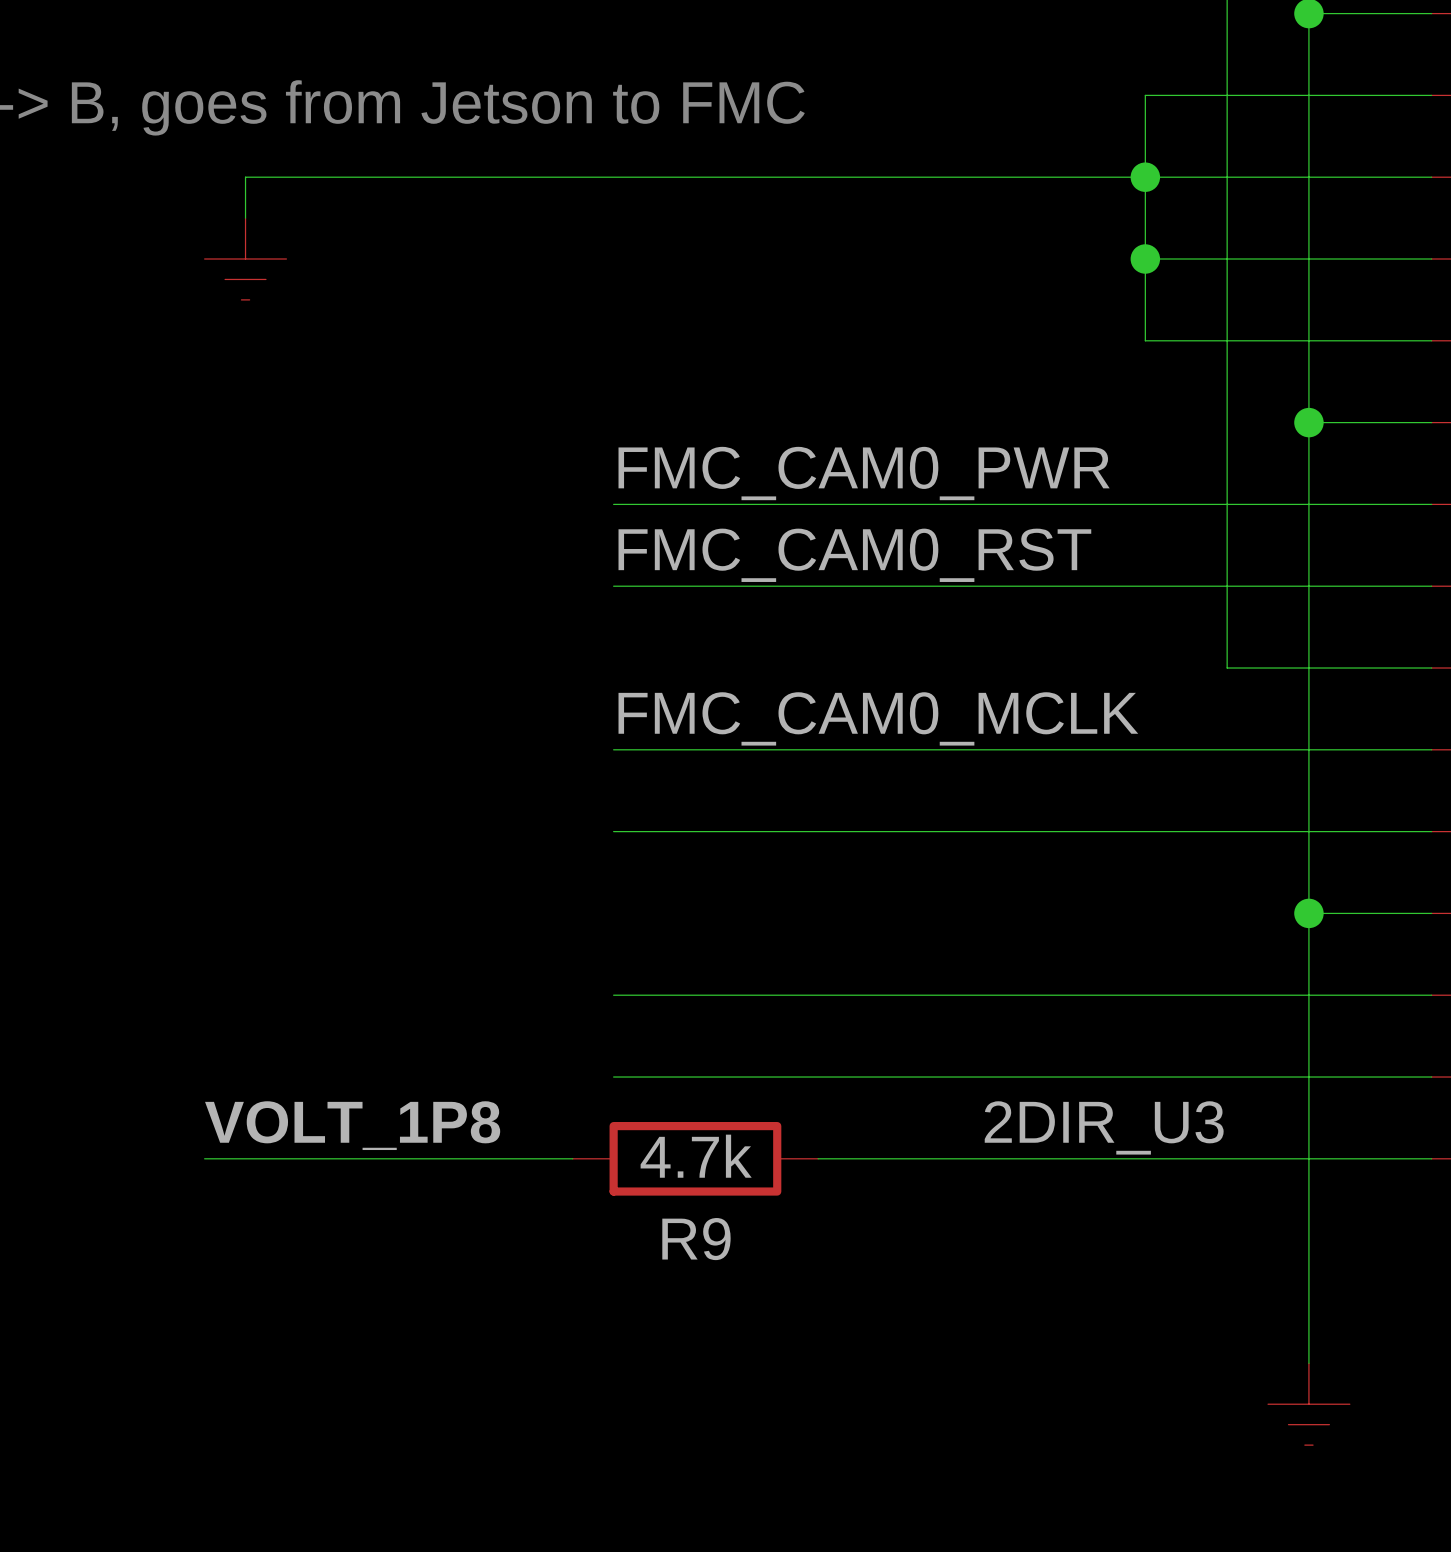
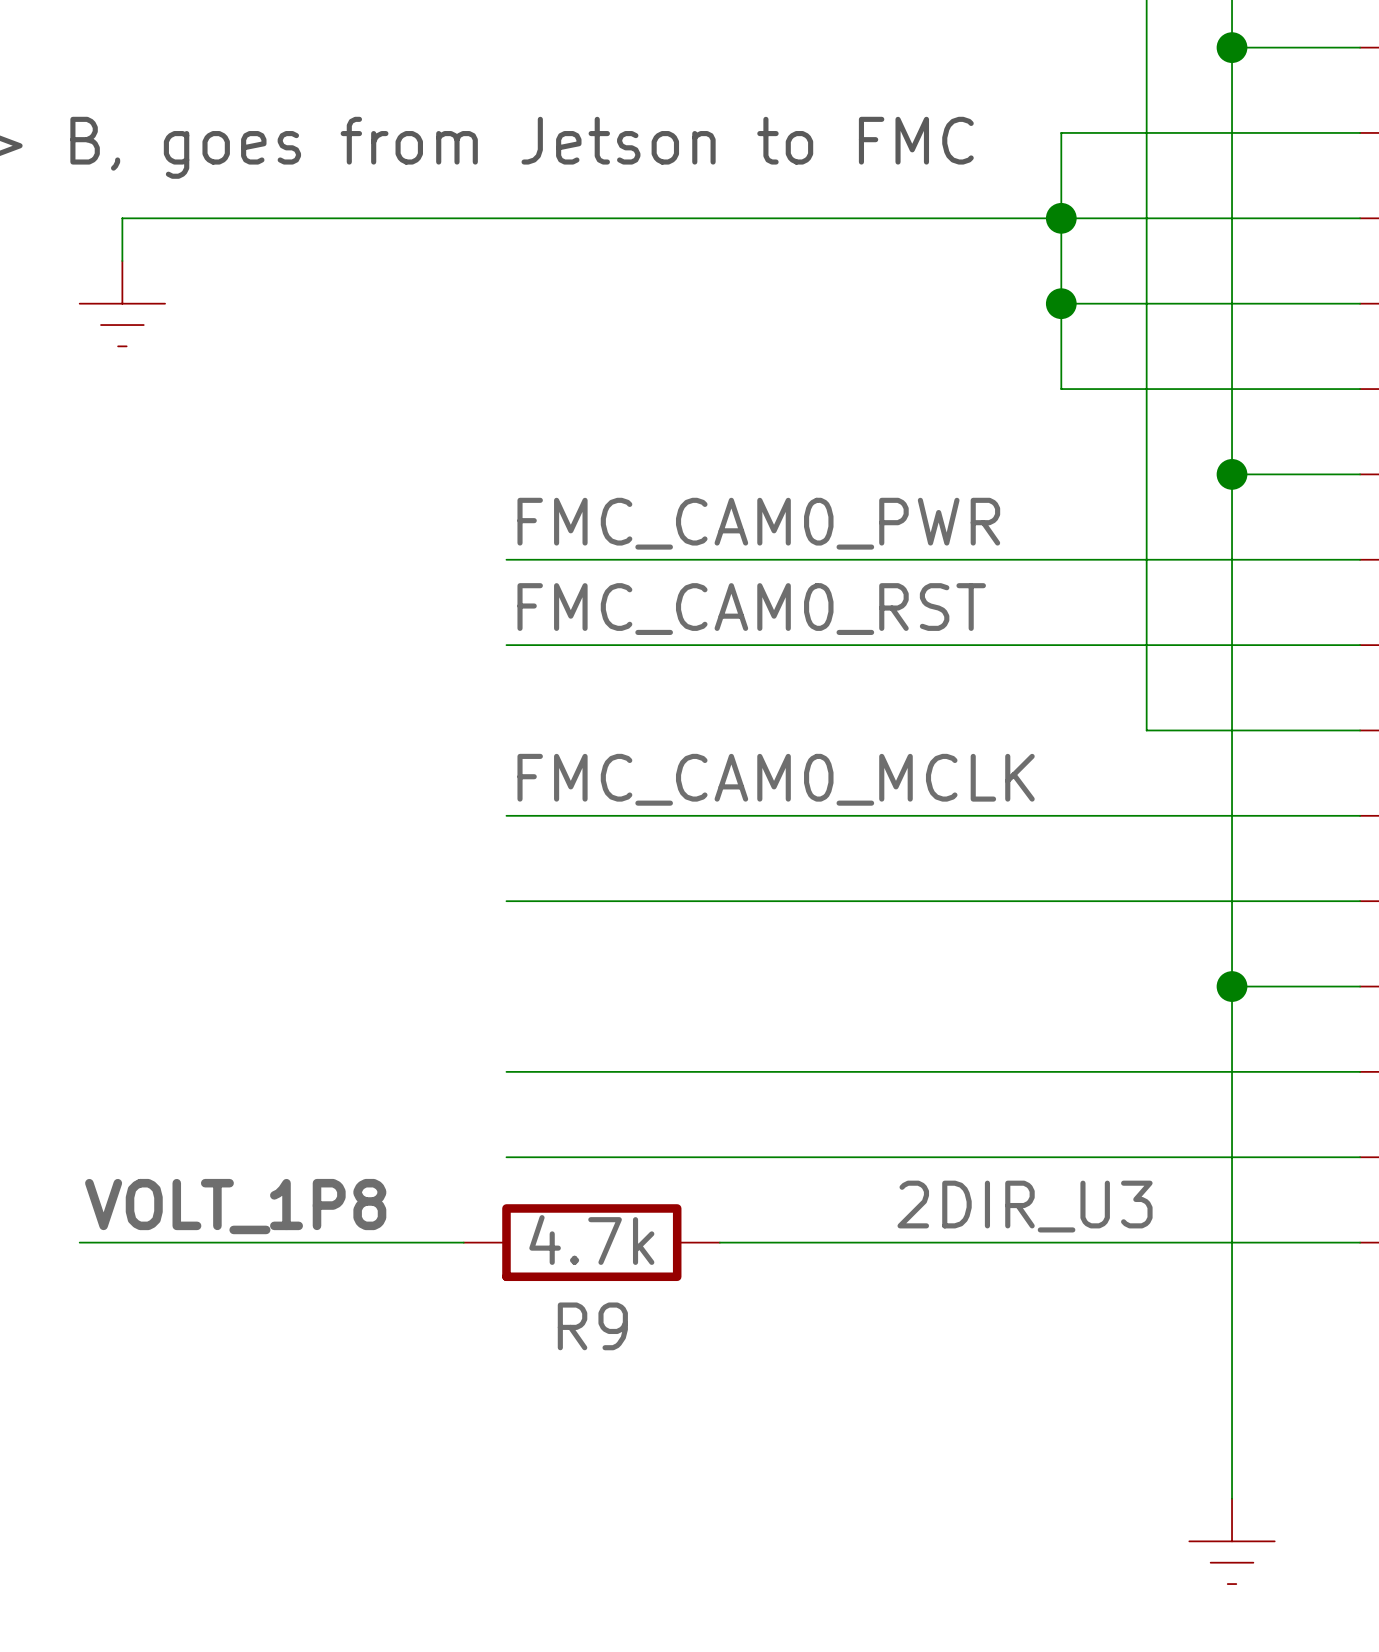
power symbol position: (1308, 1404) -> (1232, 1541)

